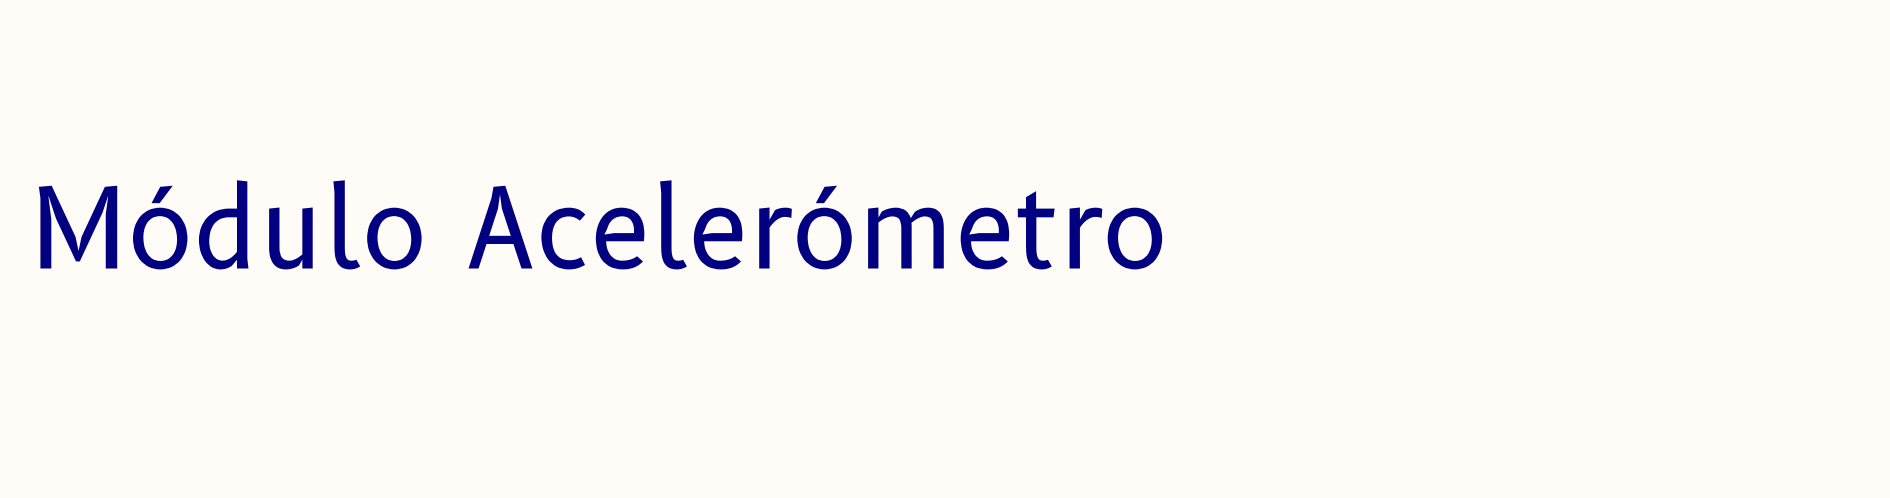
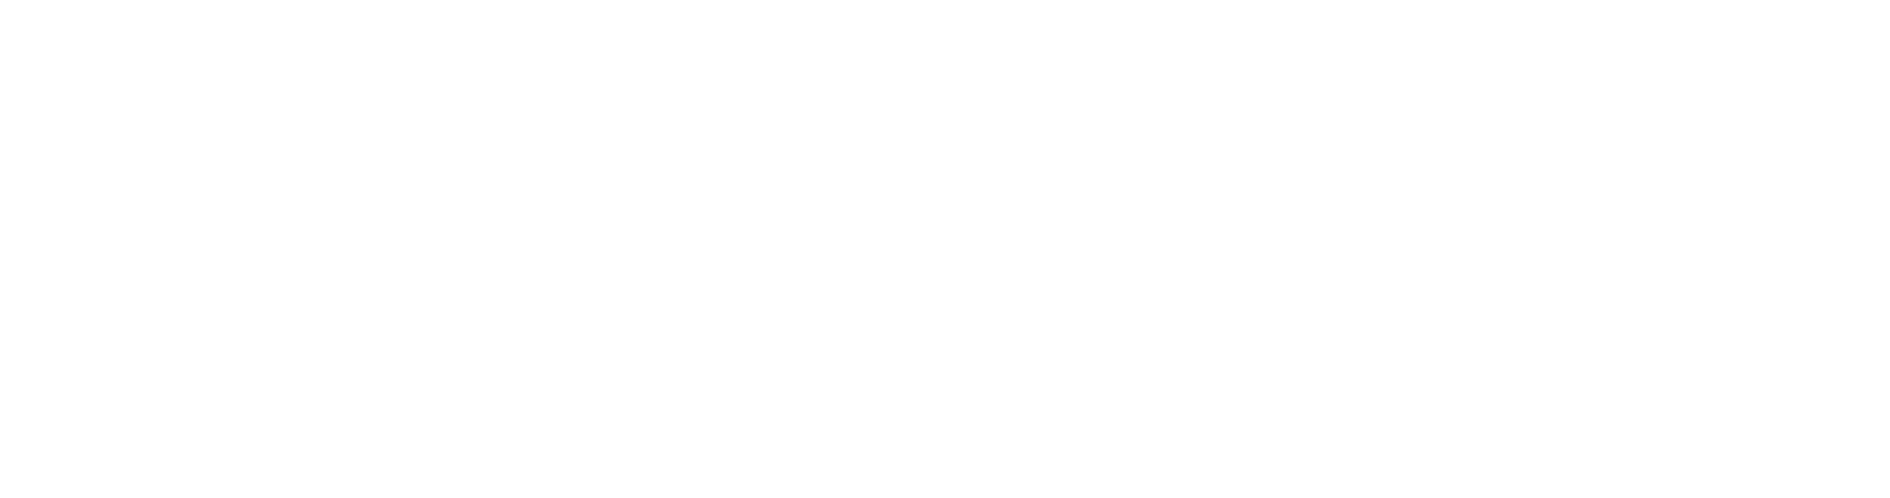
text: Módulo Acelerómetro (600, 224) -> none

